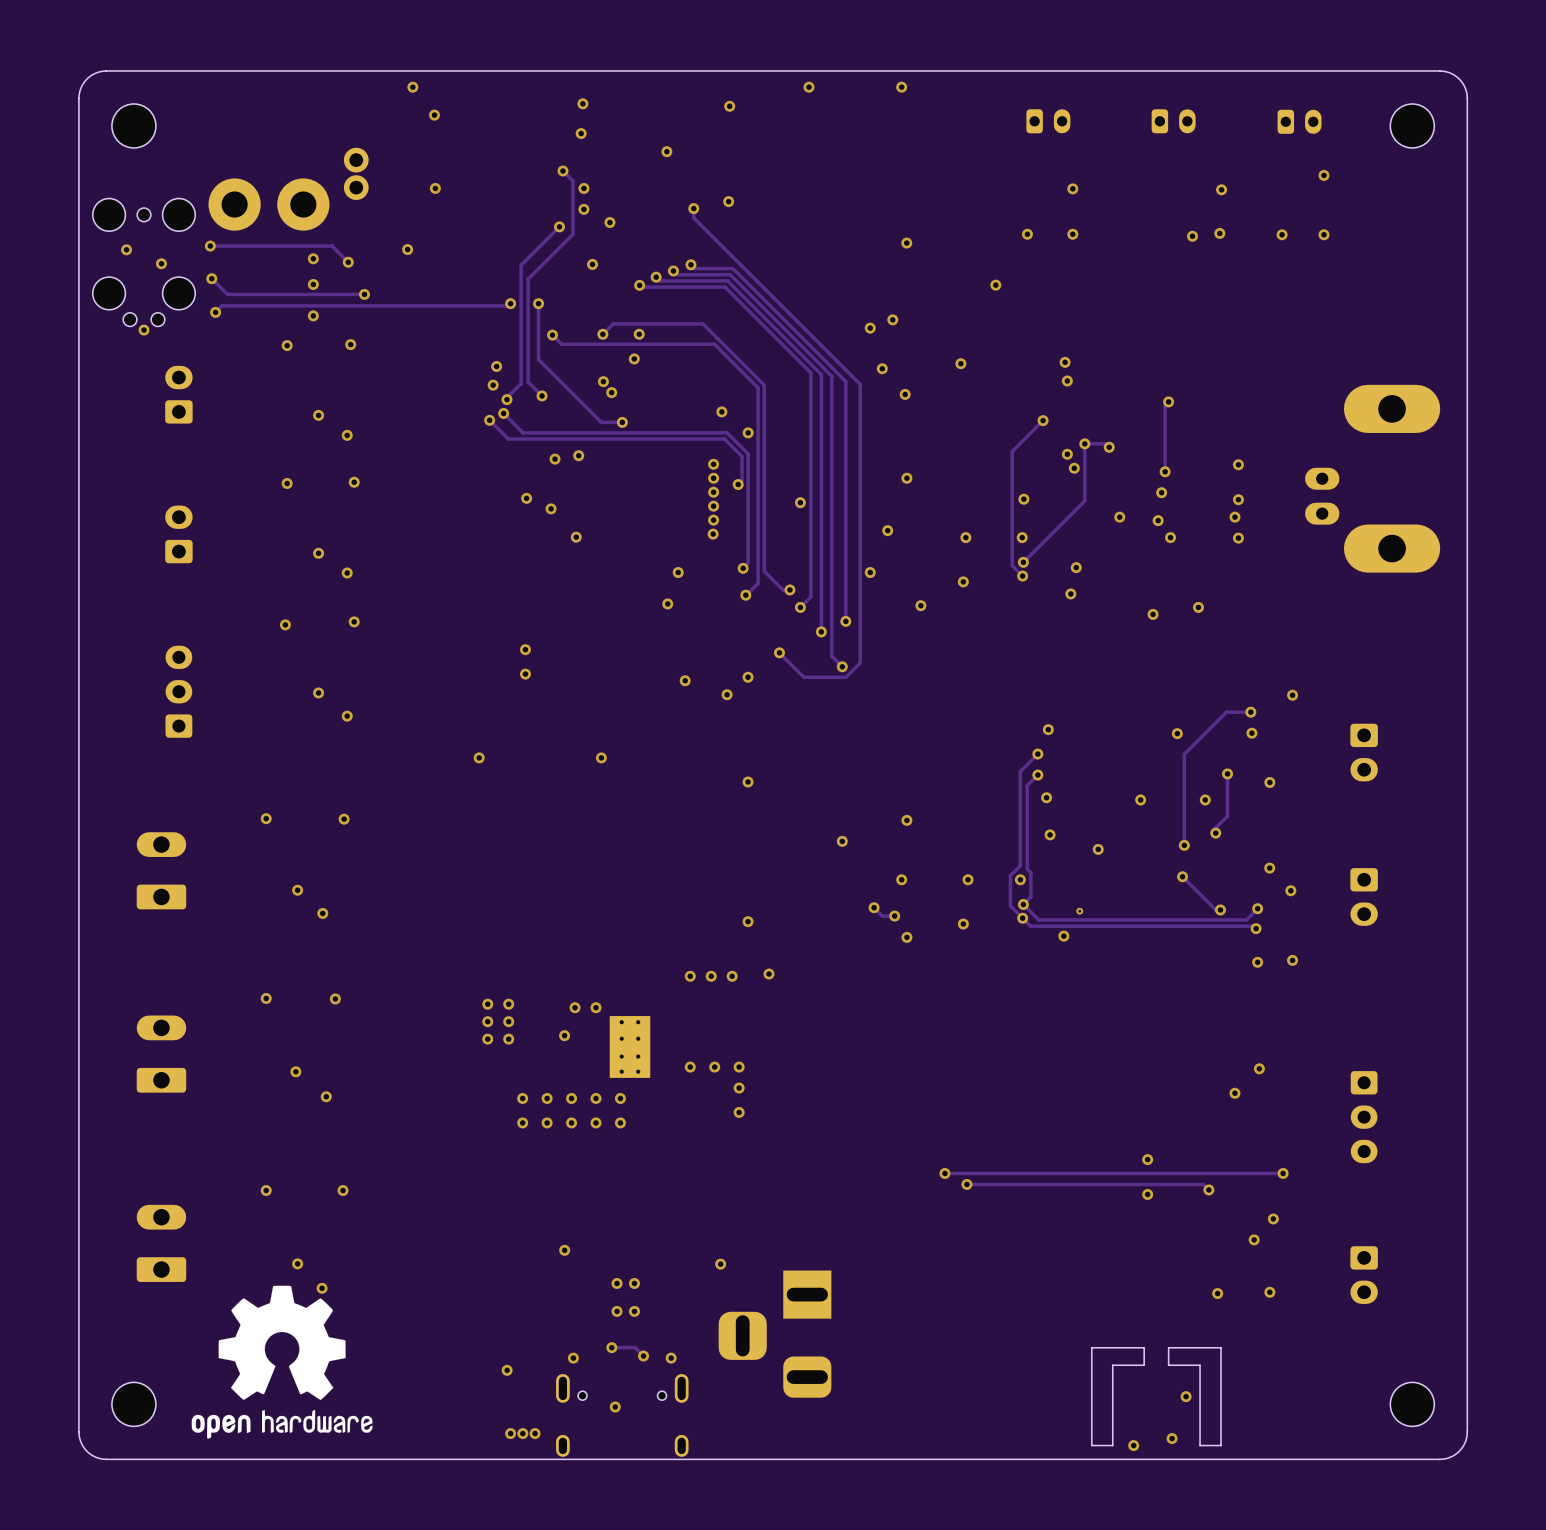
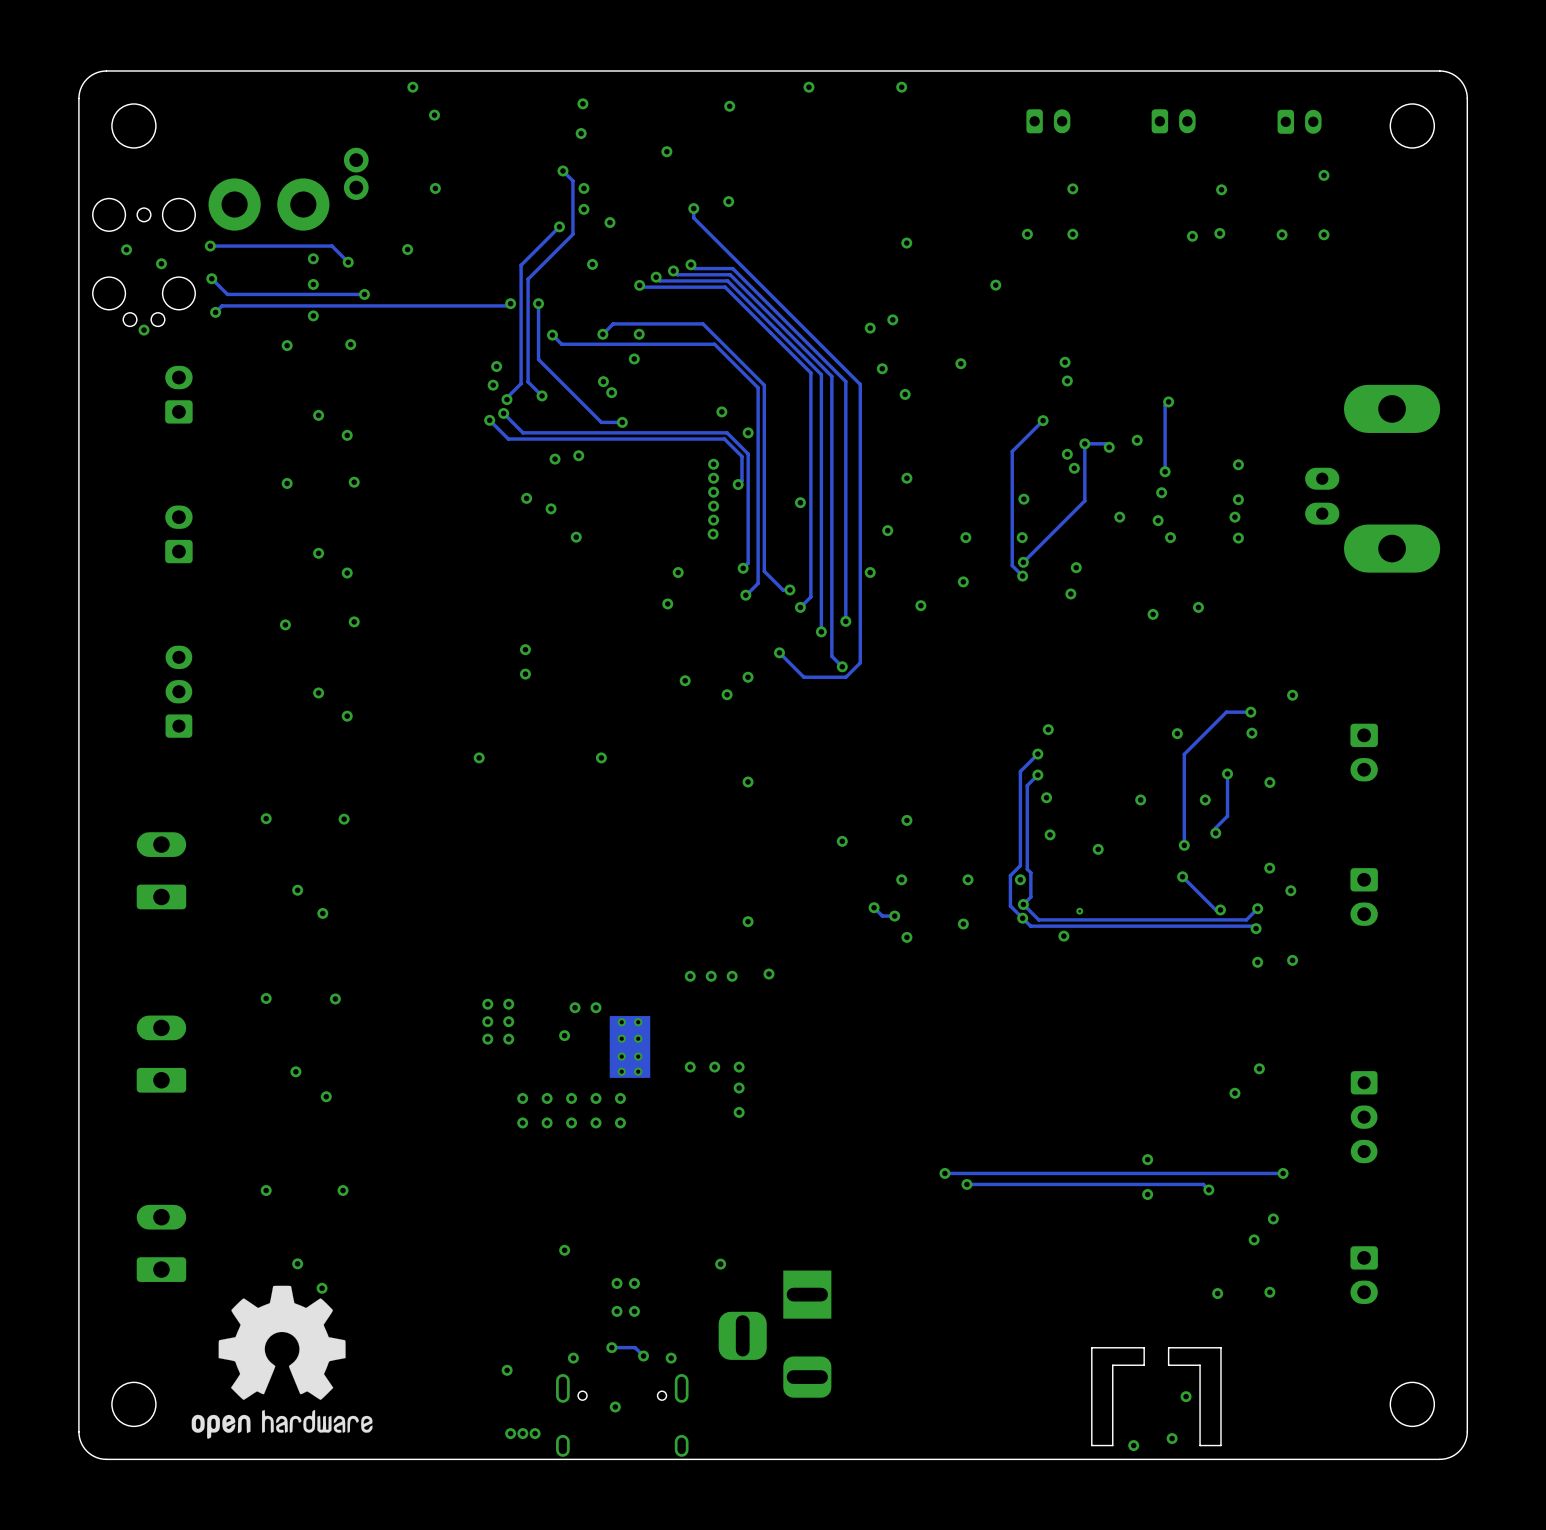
via: none -> (1137, 440)

